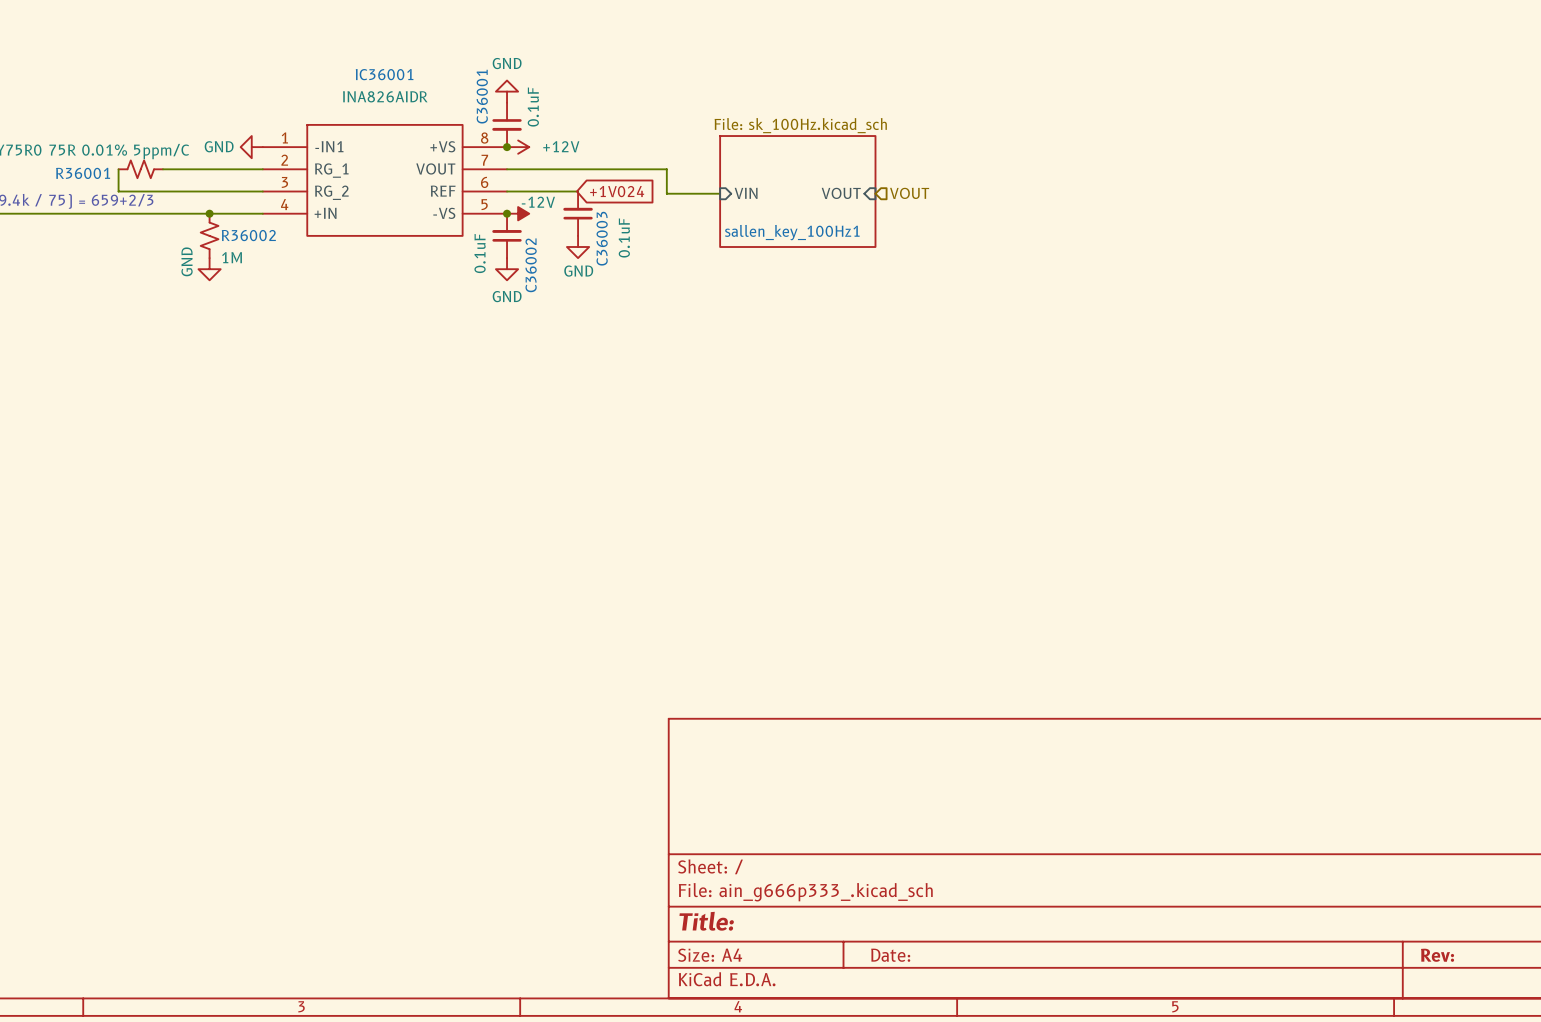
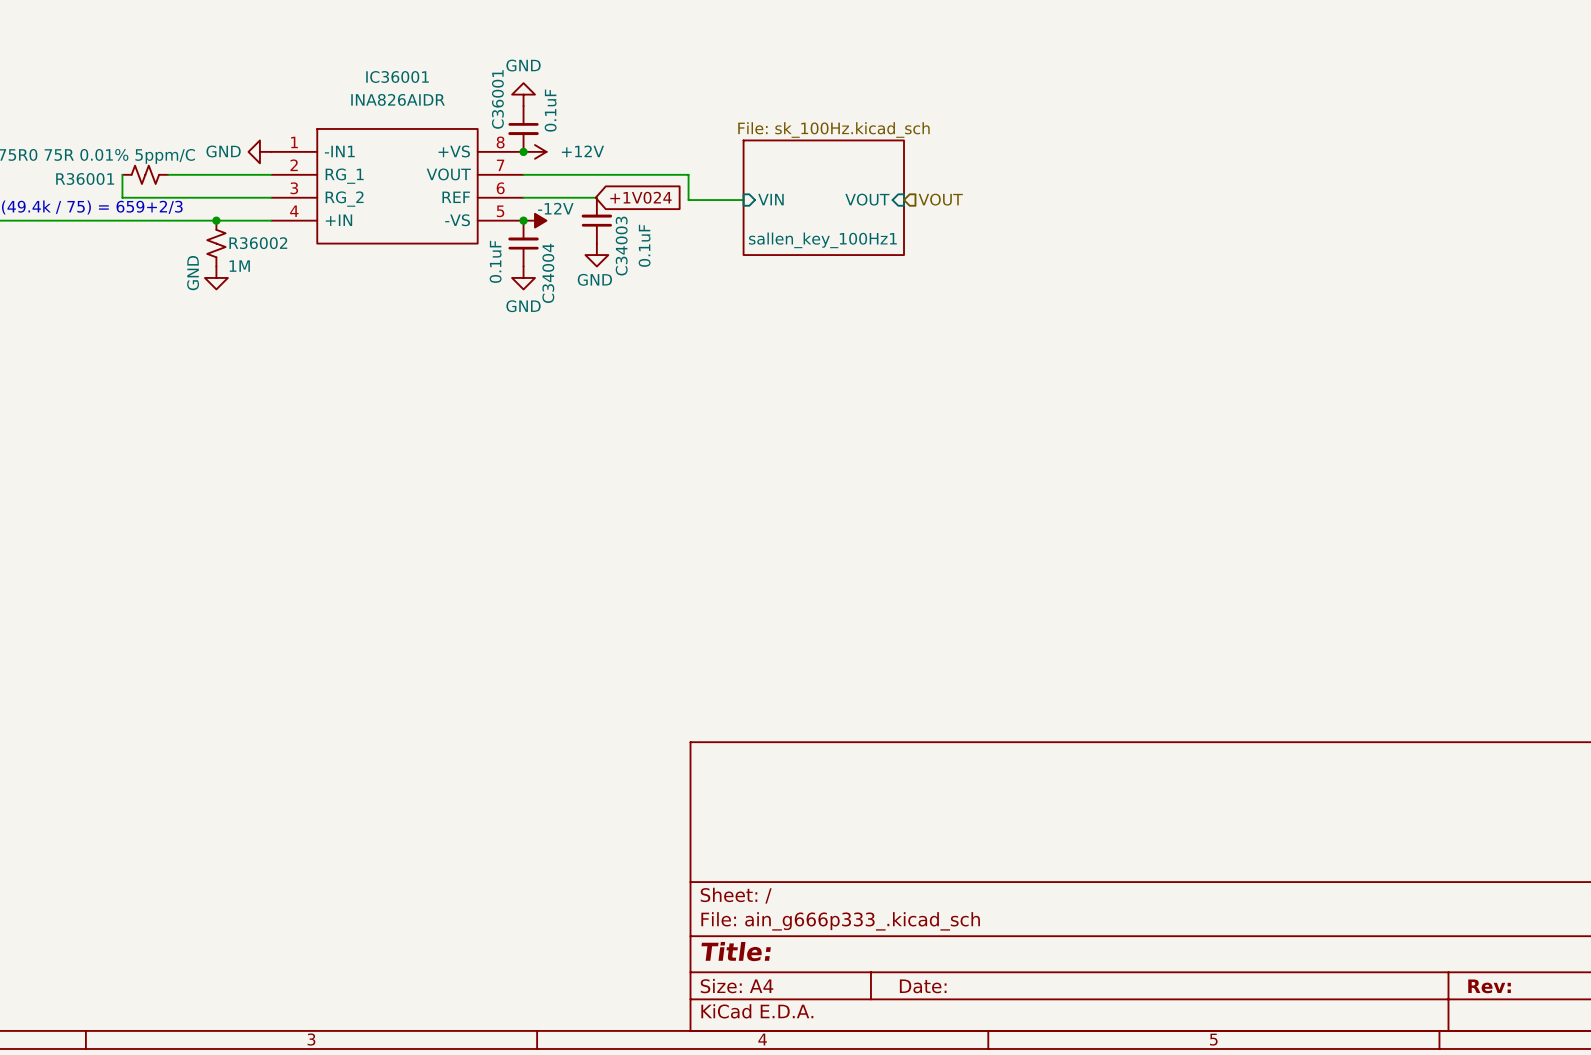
C36003 name: C36003 (602, 238) -> C34003 (621, 246)
C36002 name: C36002 (531, 265) -> C34004 (548, 273)

